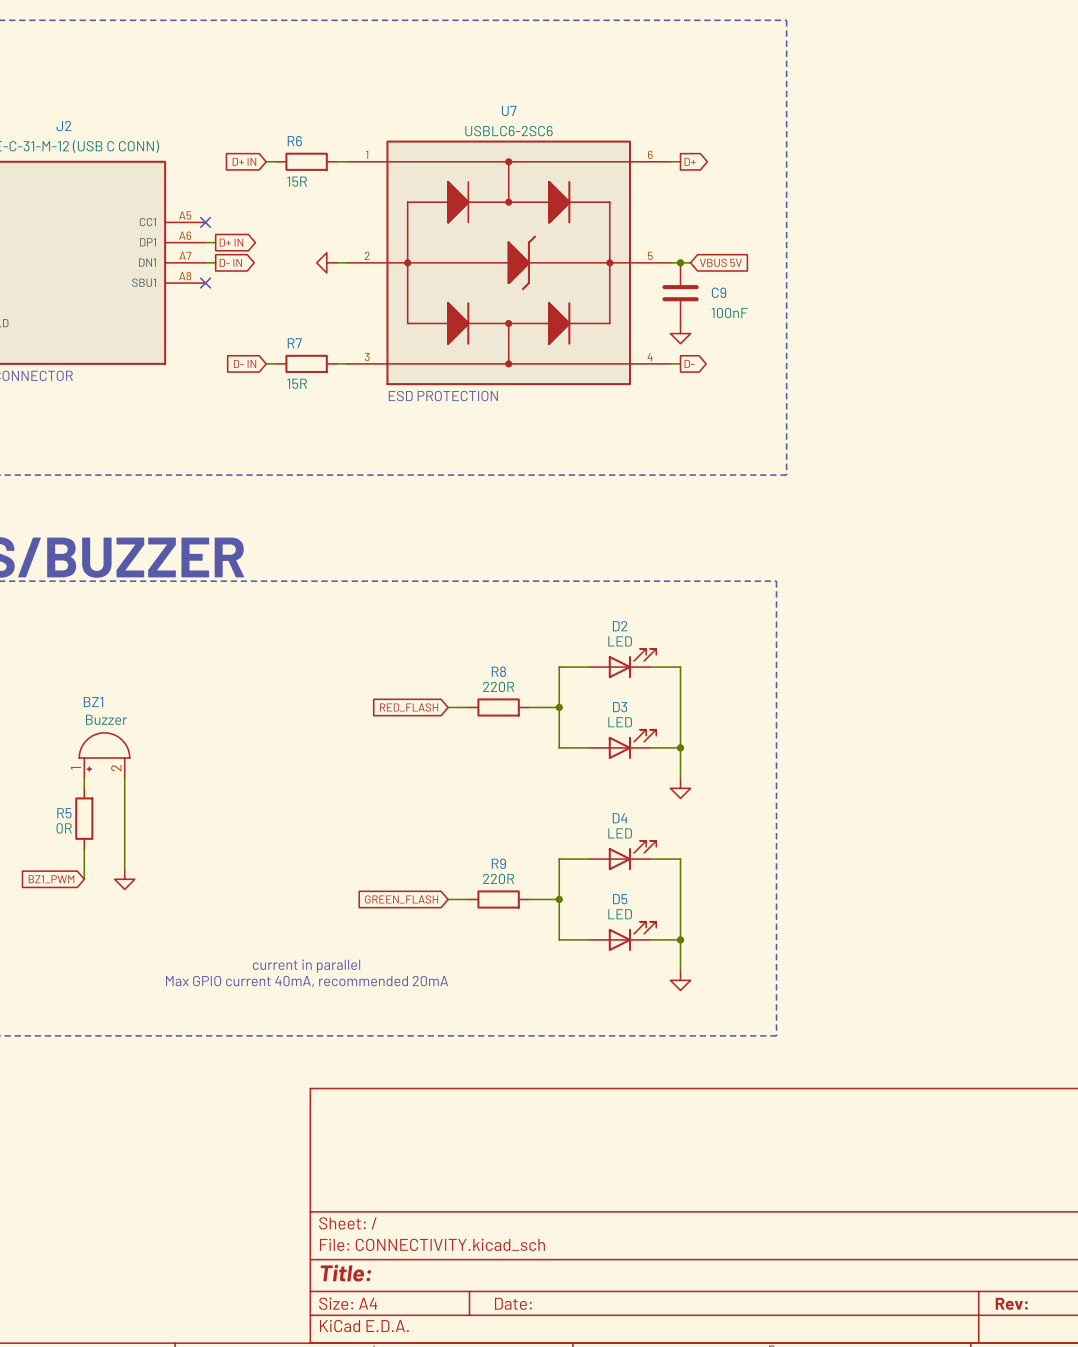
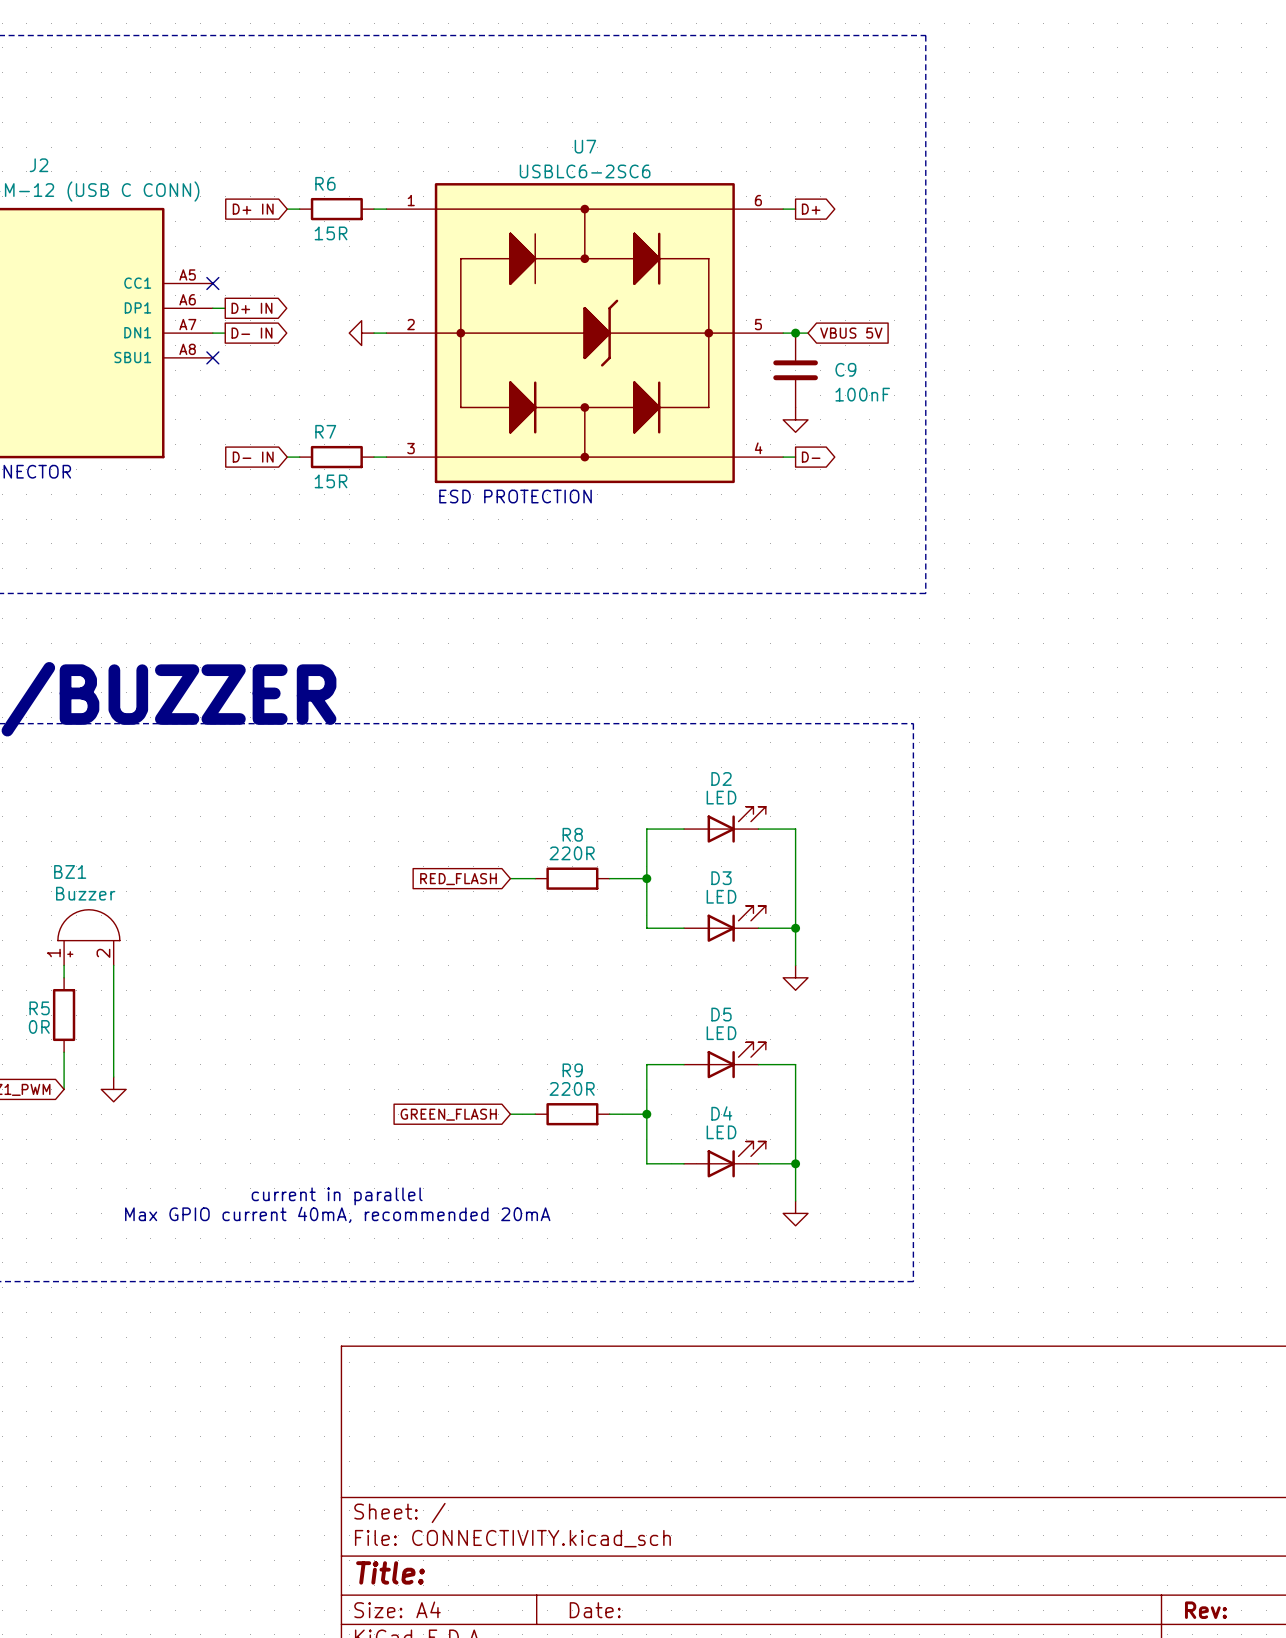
D4 name: D4 (620, 818) -> D5 (721, 1014)
D5 name: D5 (620, 899) -> D4 (721, 1113)

